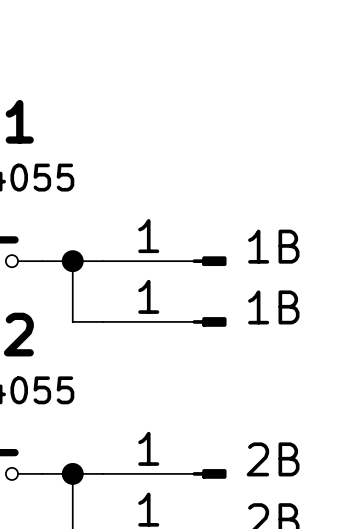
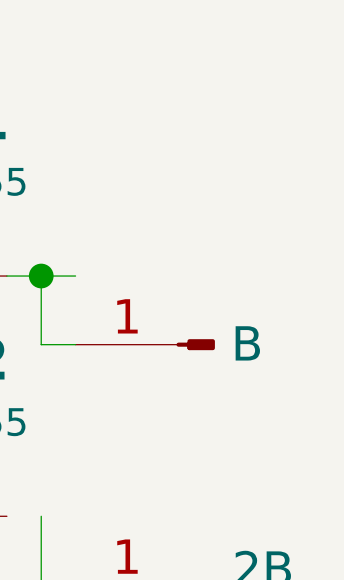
part: 1B (164, 261) -> none
part value: 1B (273, 307) -> B (247, 343)
wire: (42, 473) (103, 473) -> none
junction: (72, 473) -> none
part: 2B (164, 473) -> none

